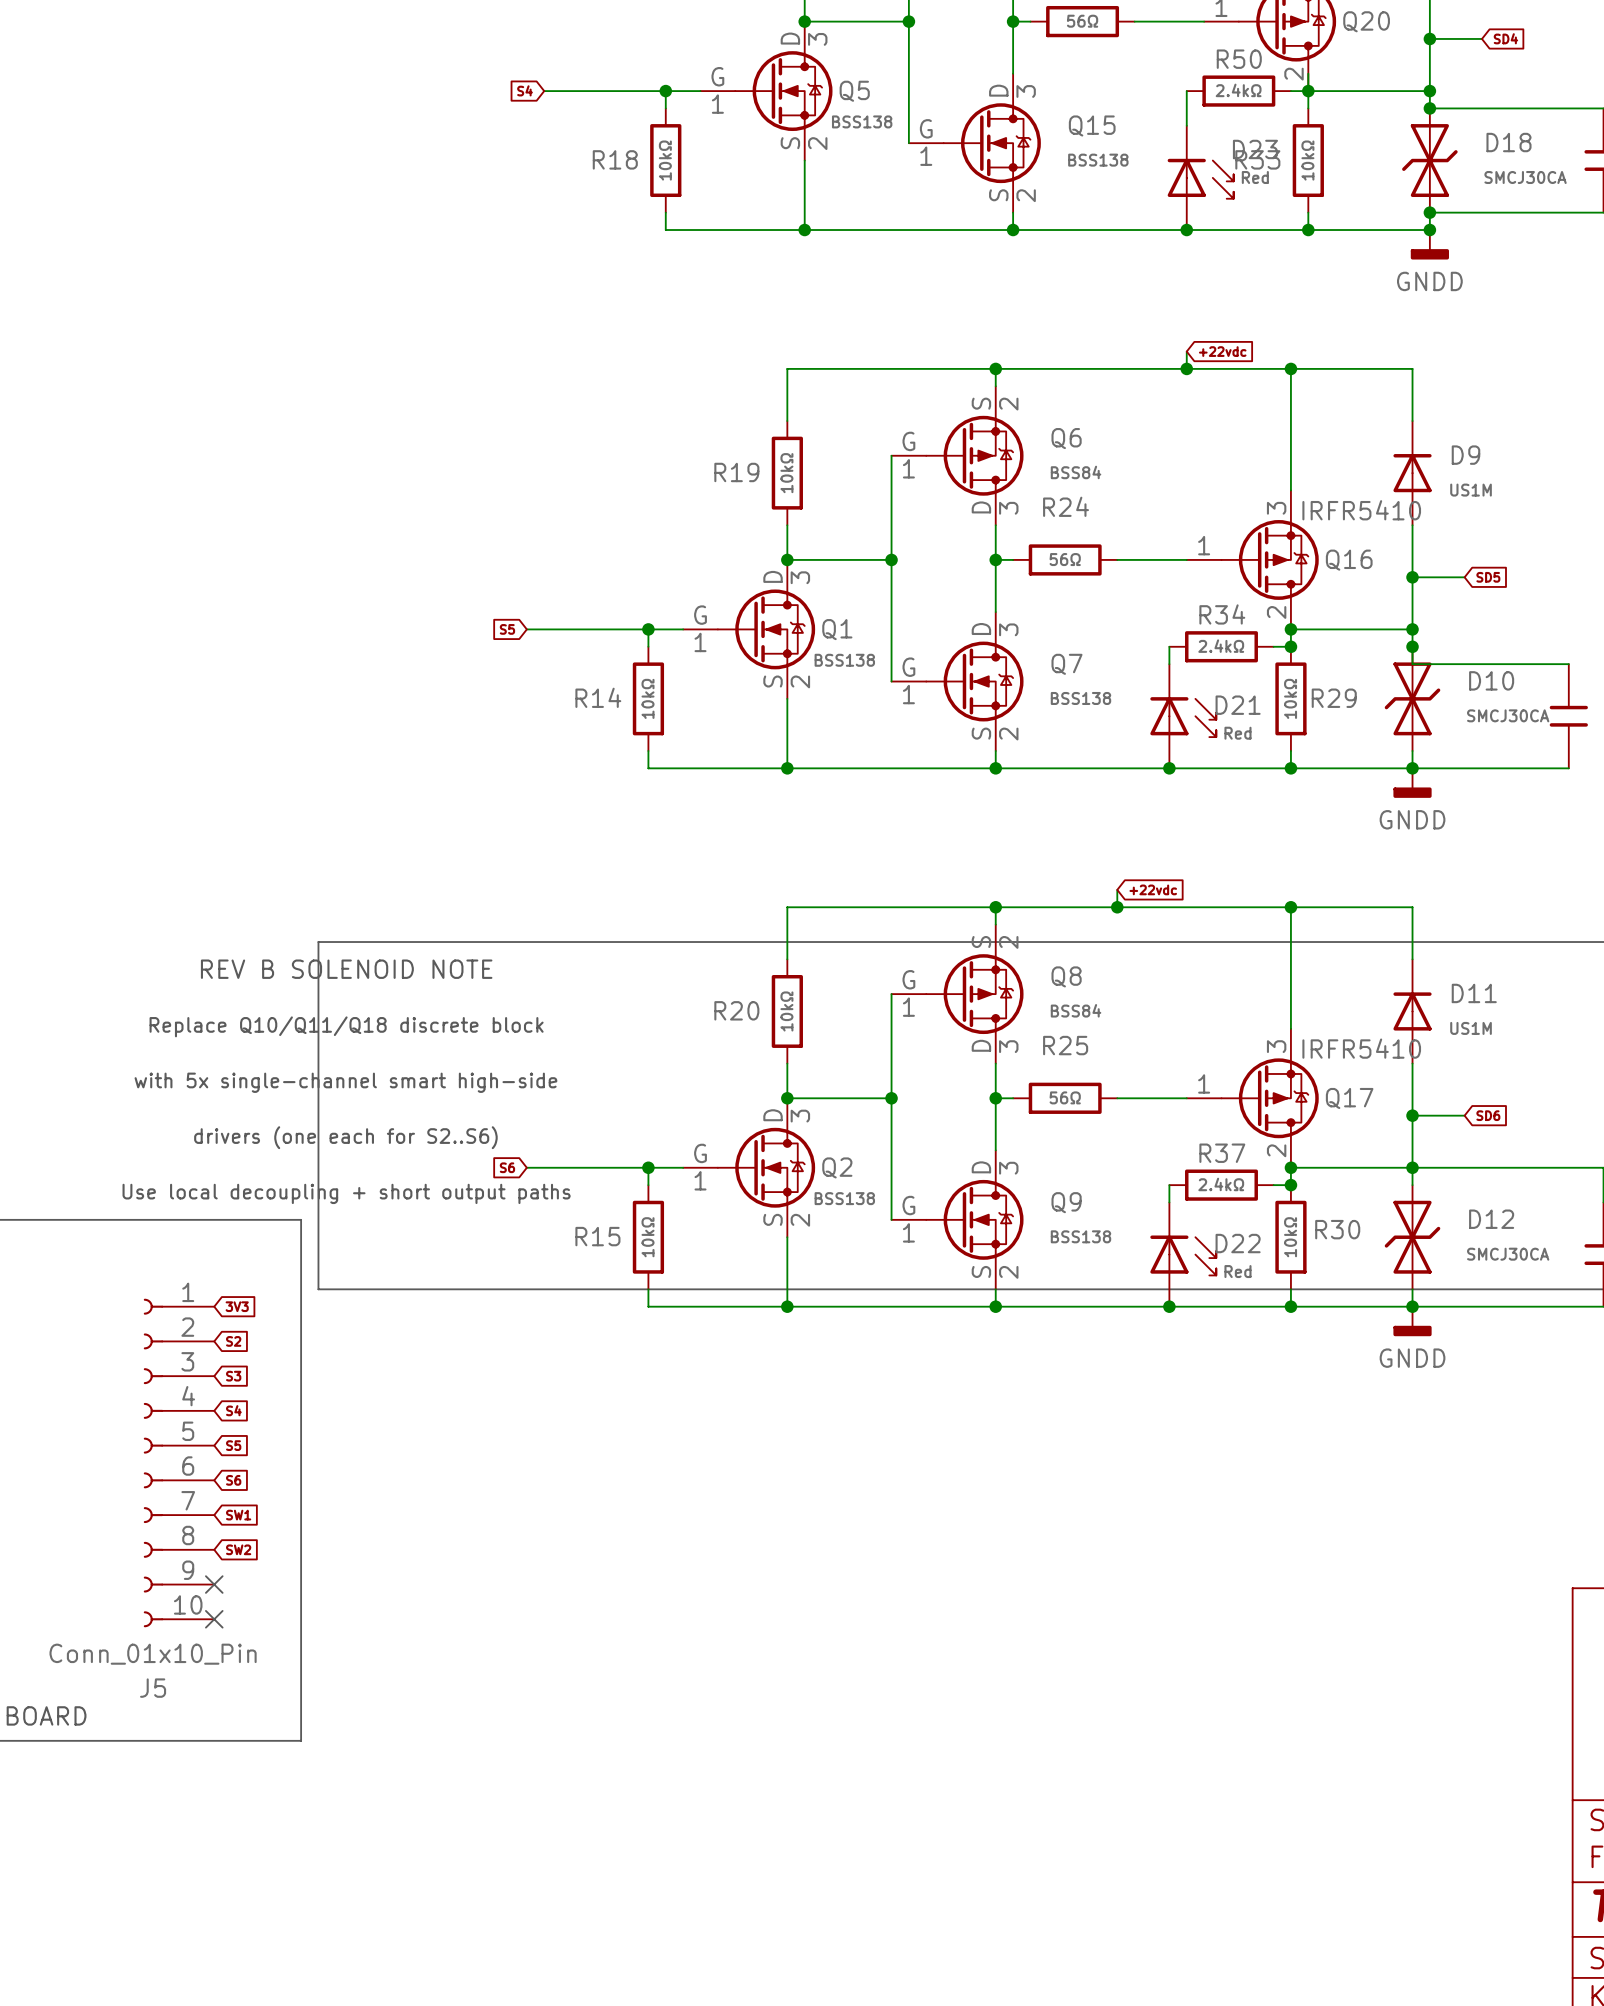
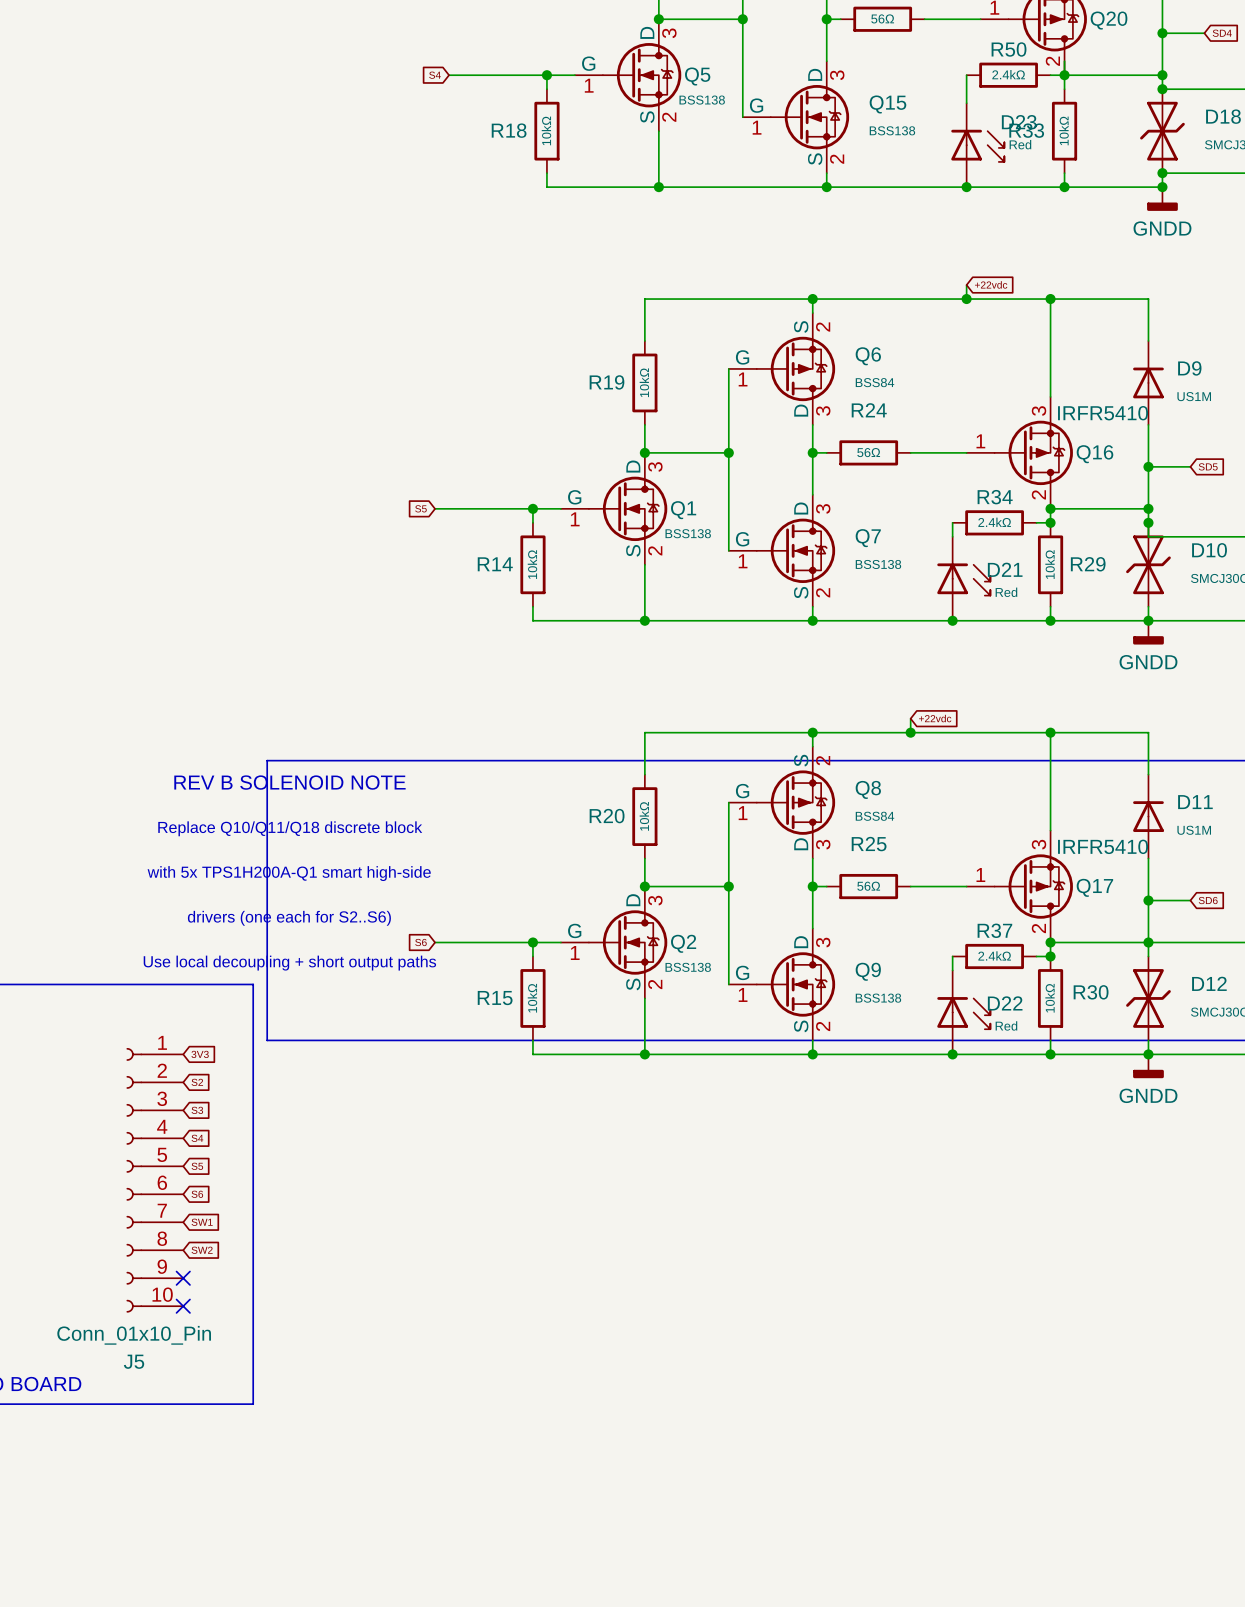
text: with 5x single-channel smart high-side (345, 1082) -> with 5x TPS1H200A-Q1 smart high-side (289, 873)

